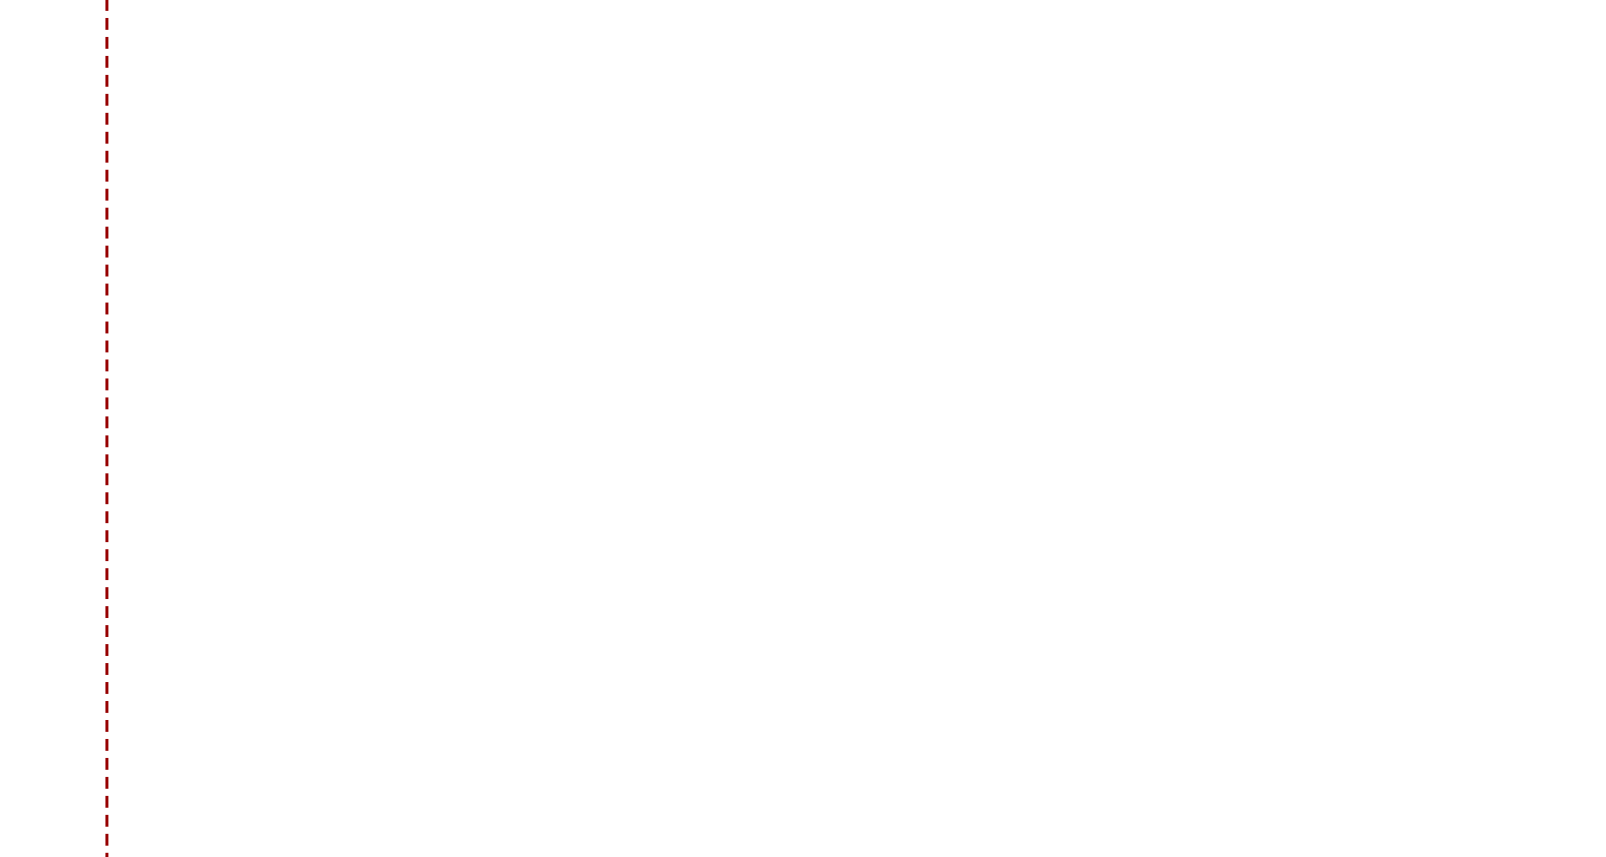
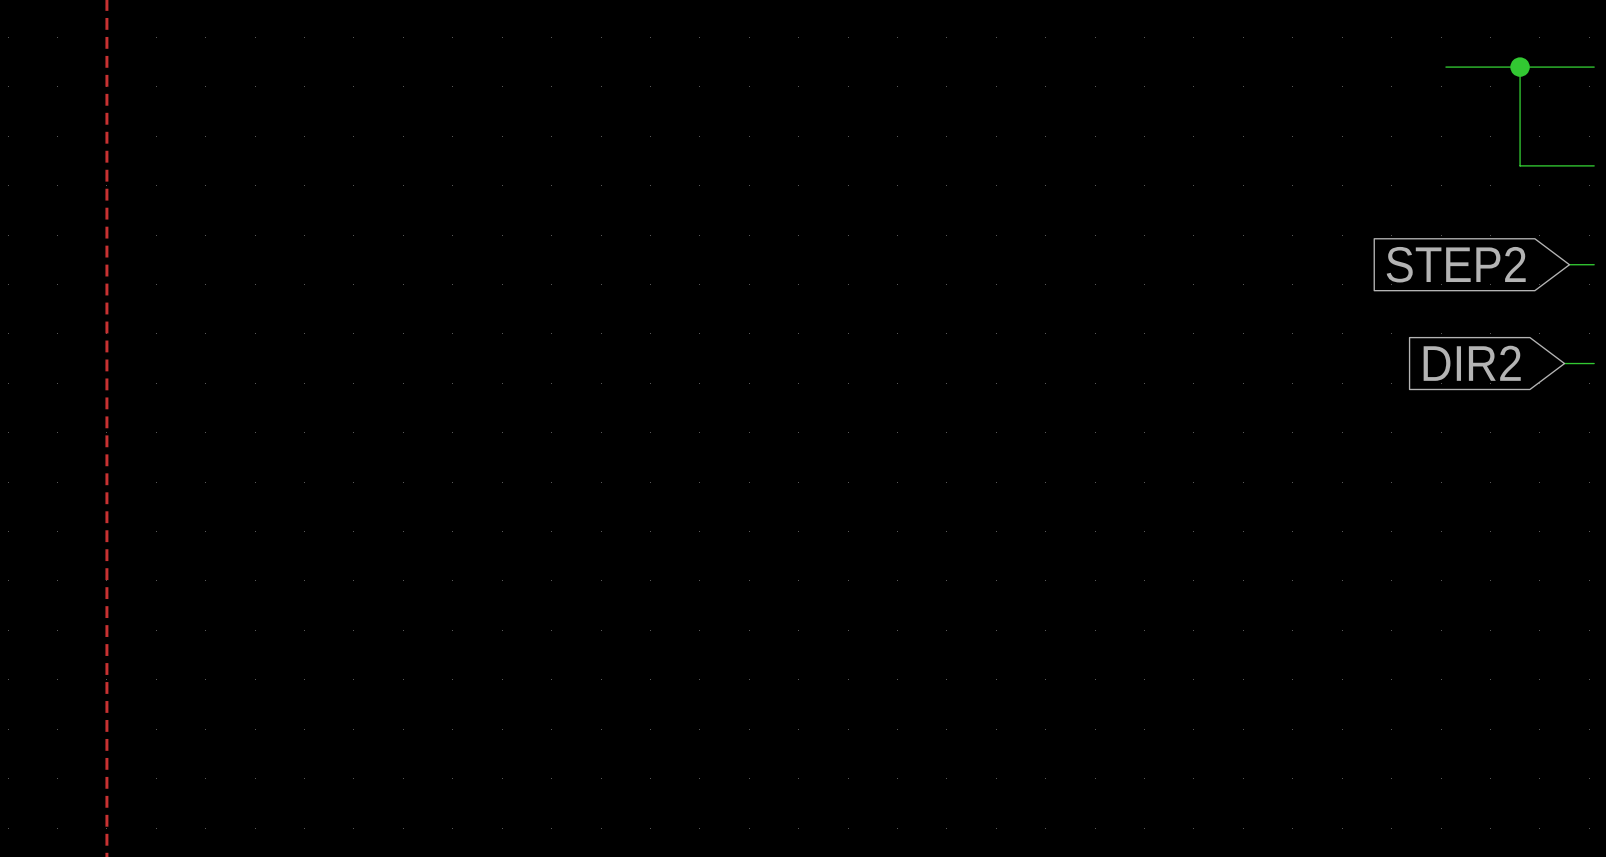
wire: none -> (1445, 67) (1594, 67)
wire: none -> (1520, 67) (1520, 165) (1594, 165)
junction: none -> (1520, 67)
global label: none -> STEP2 (1456, 264)
wire: none -> (1569, 264) (1594, 264)
global label: none -> DIR2 (1472, 363)
wire: none -> (1564, 363) (1594, 363)

